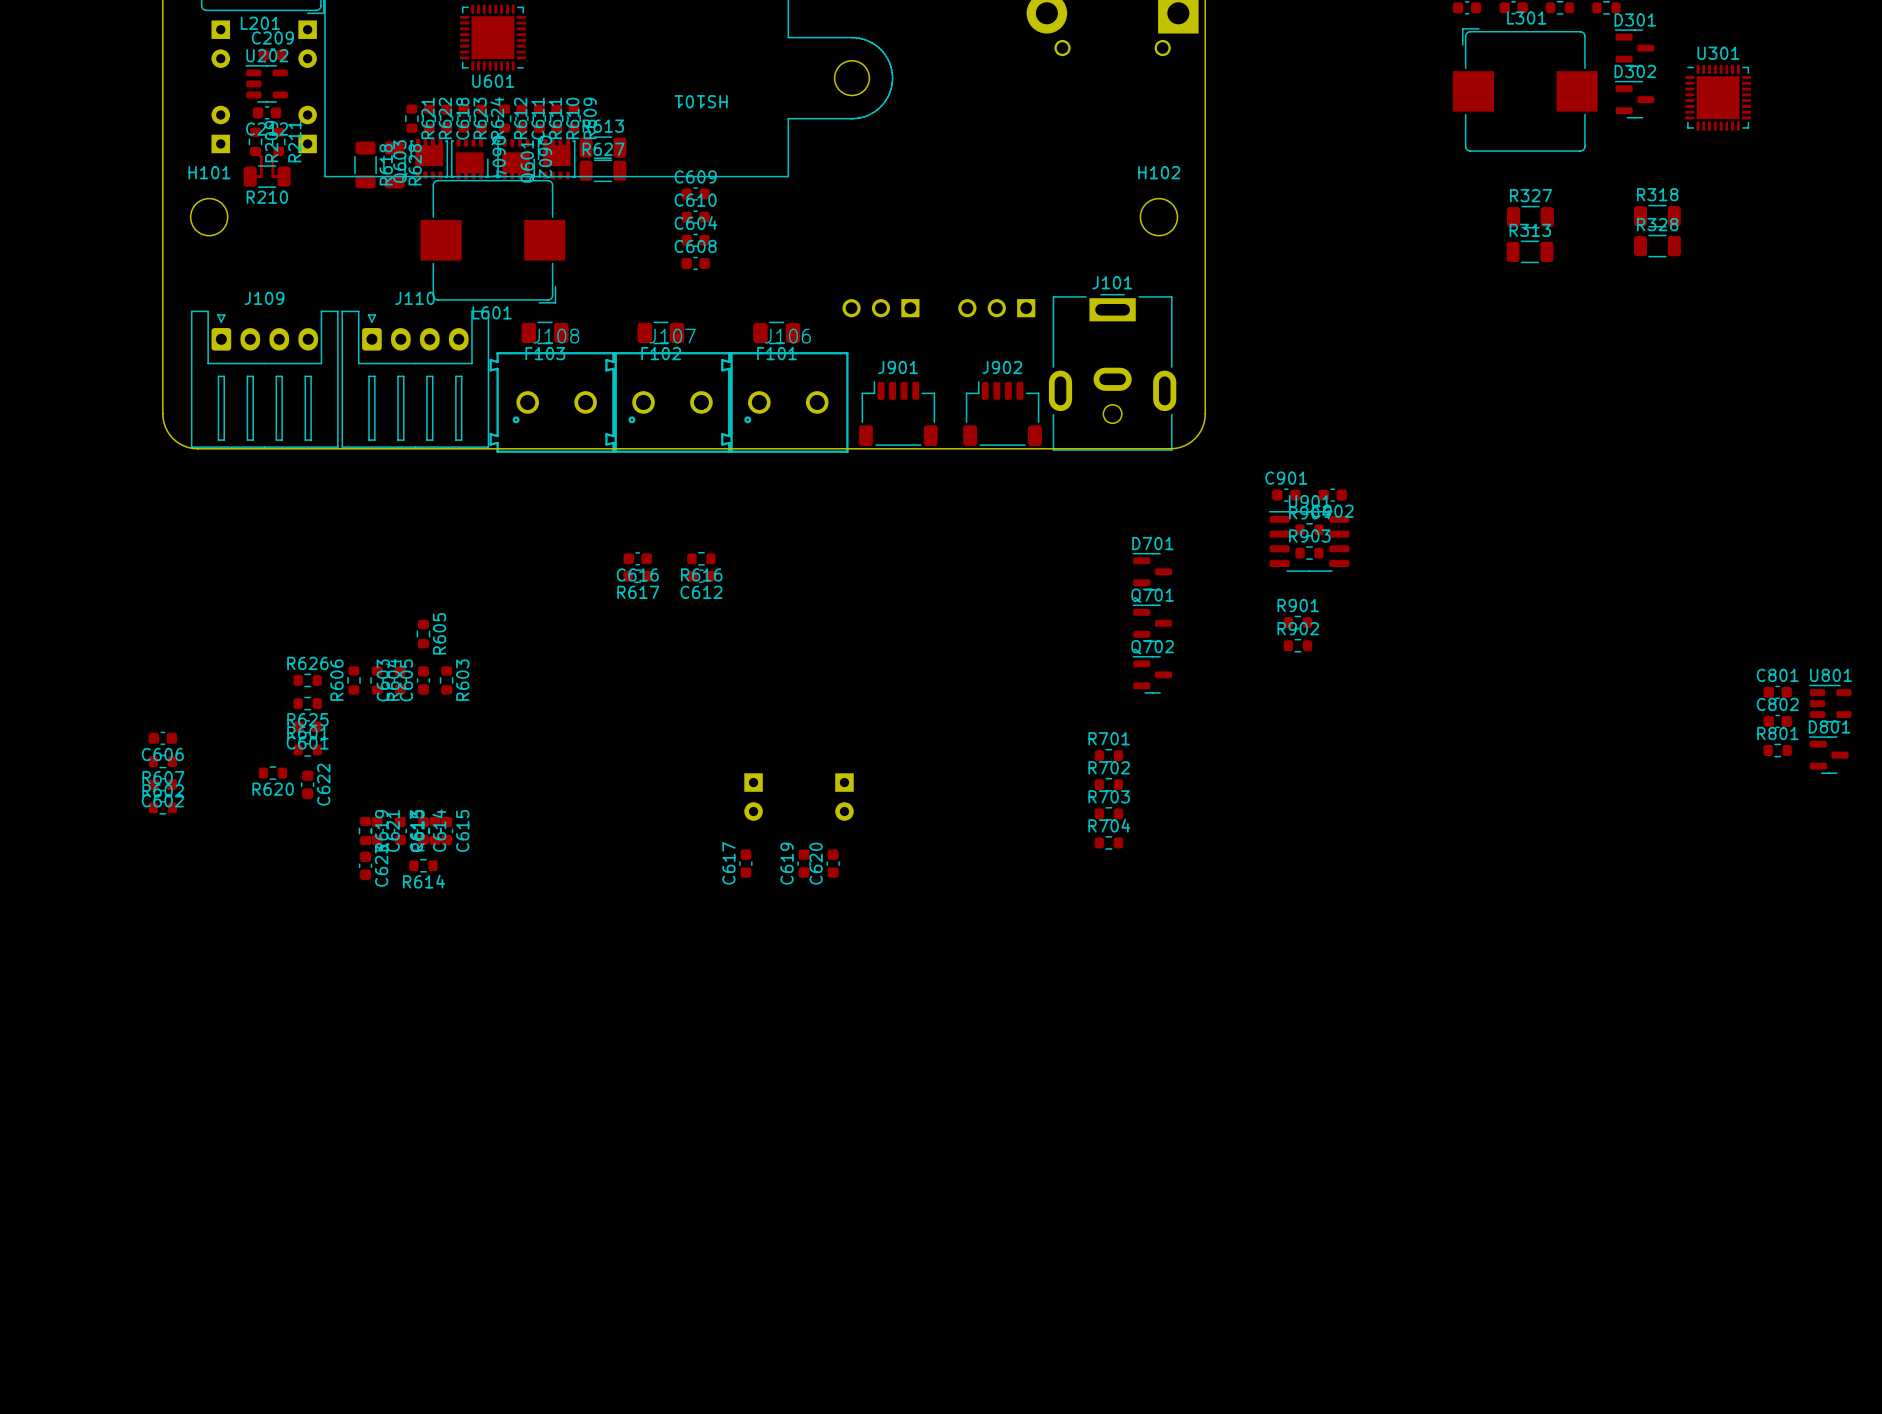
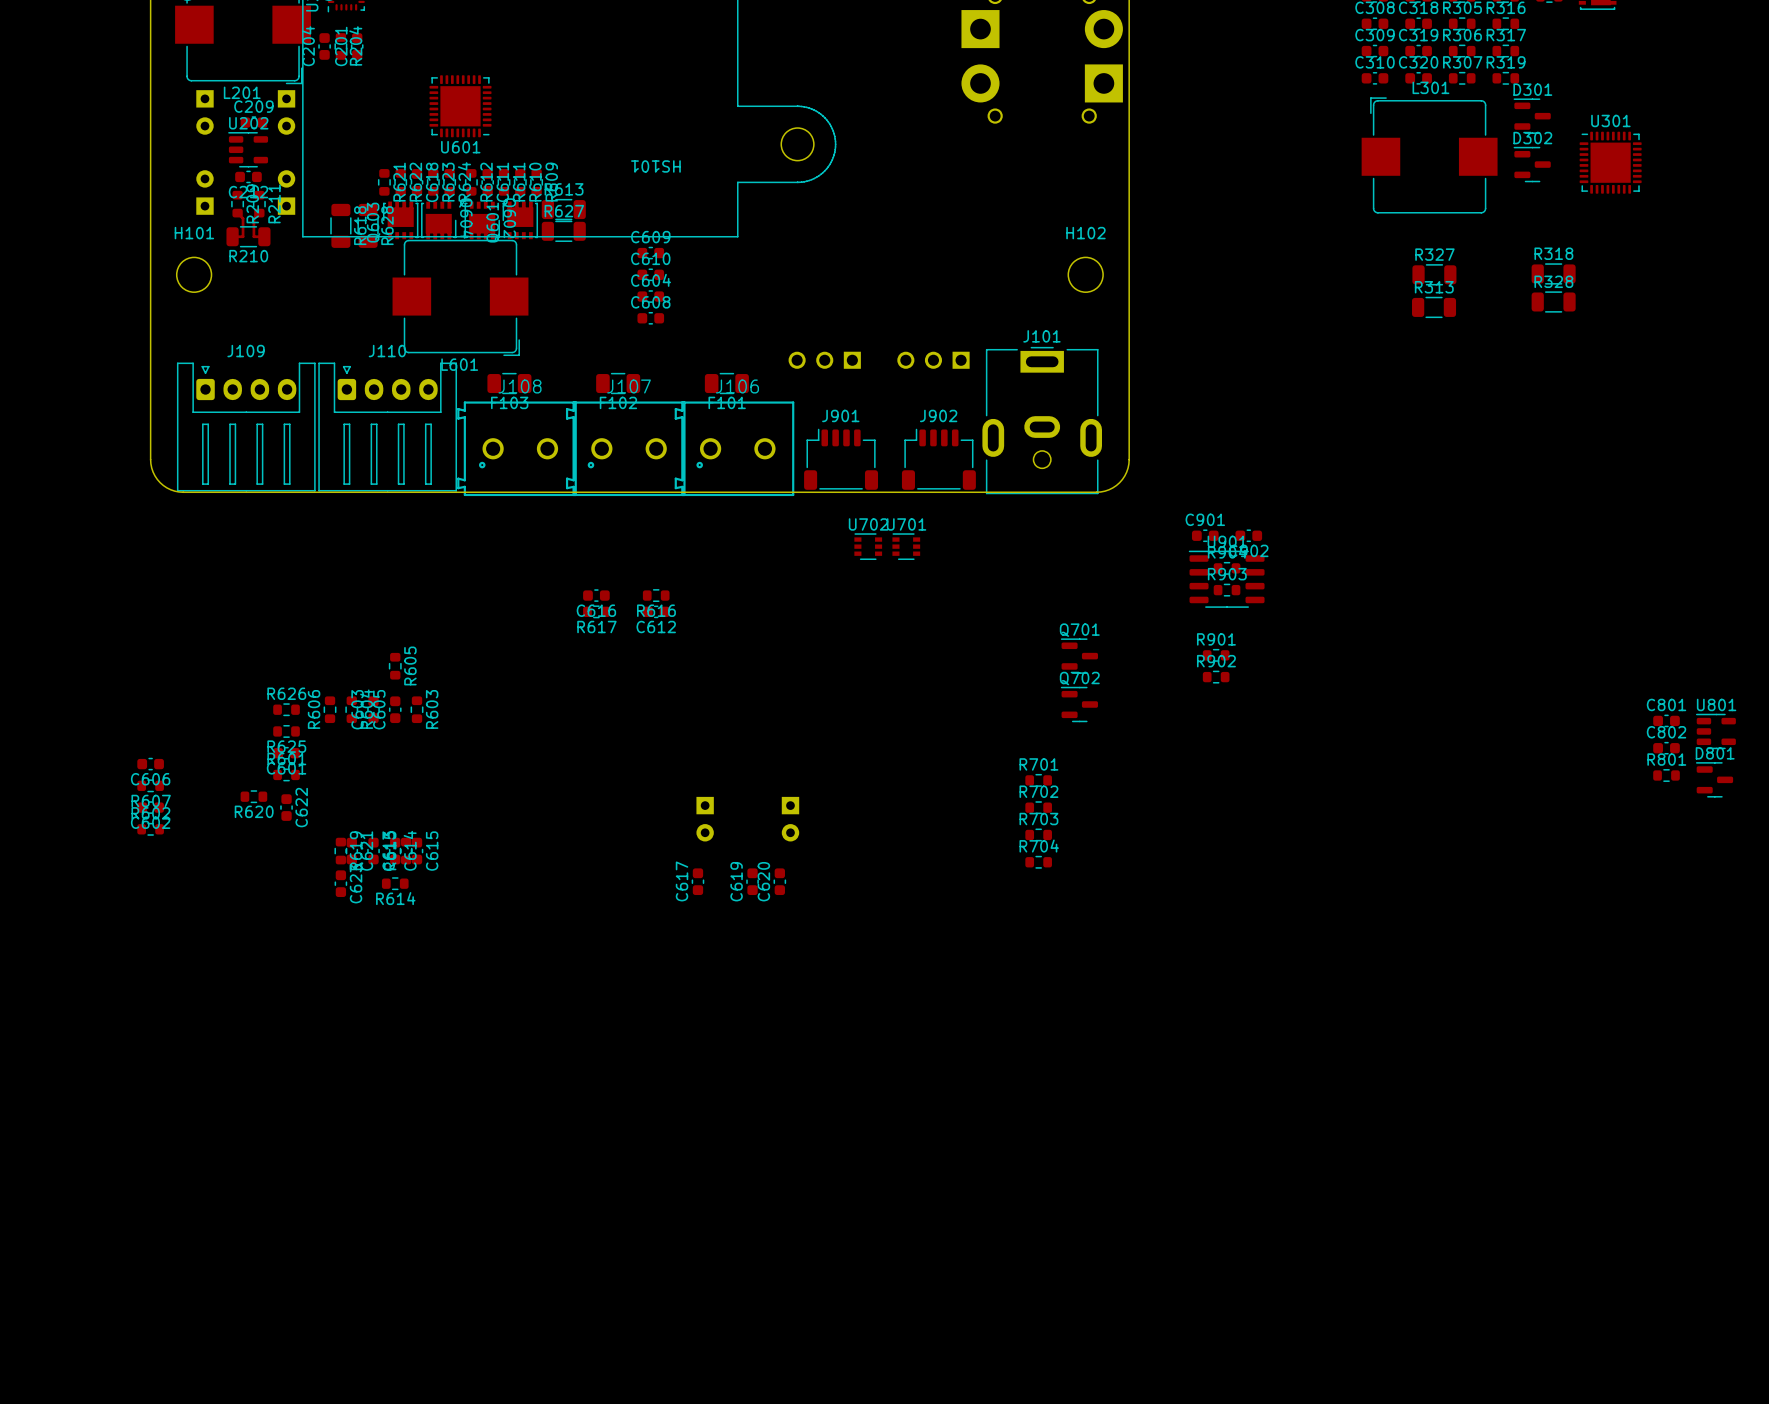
U702: none -> (868, 546)
U701: none -> (906, 546)
D701: (1152, 571) -> none

